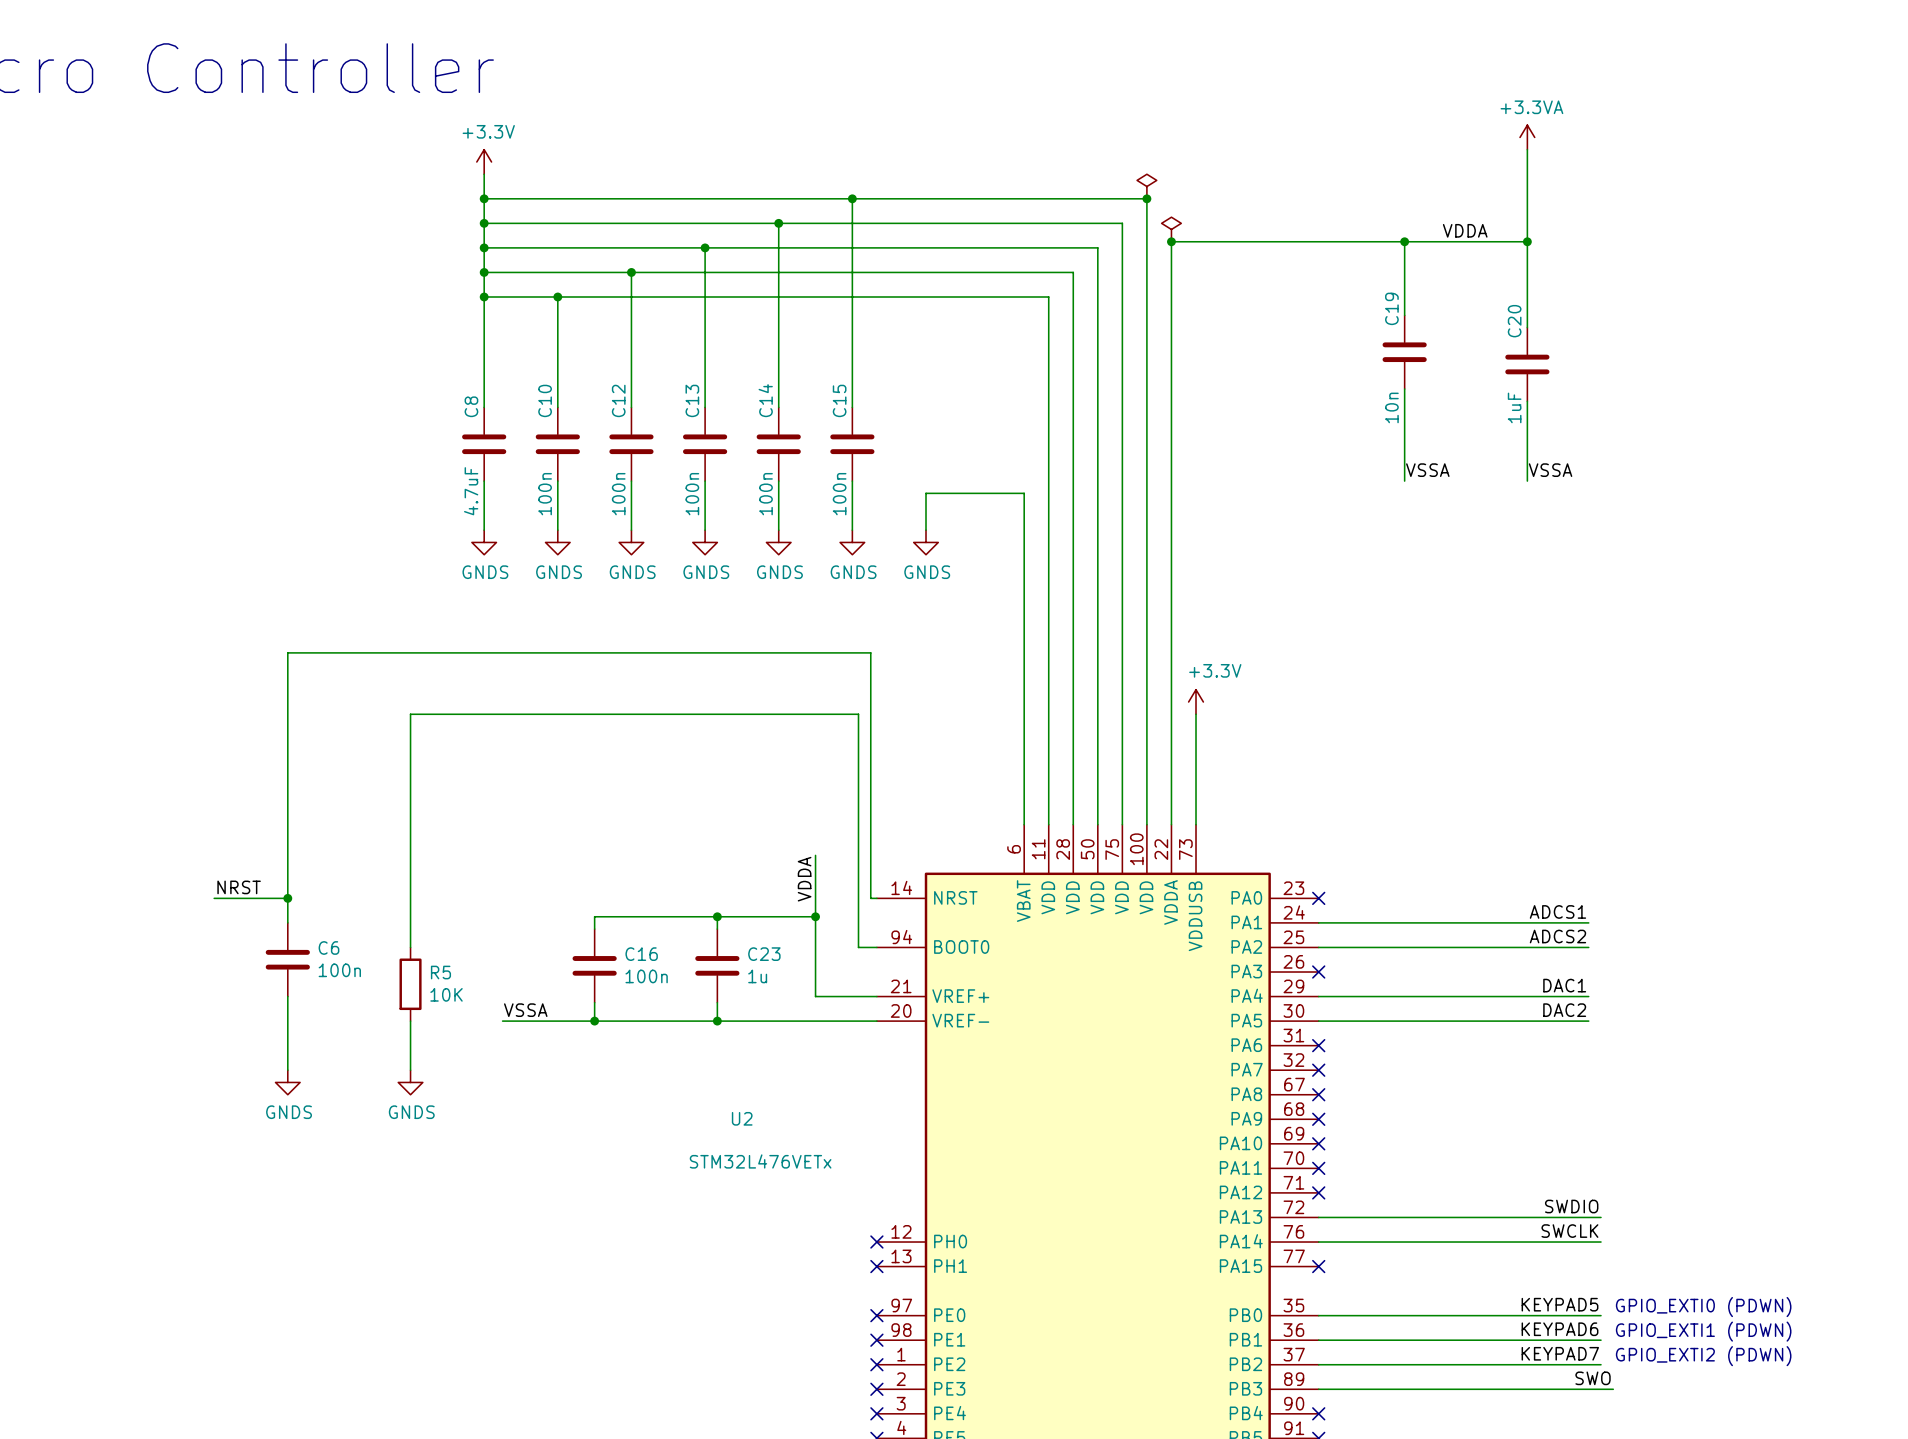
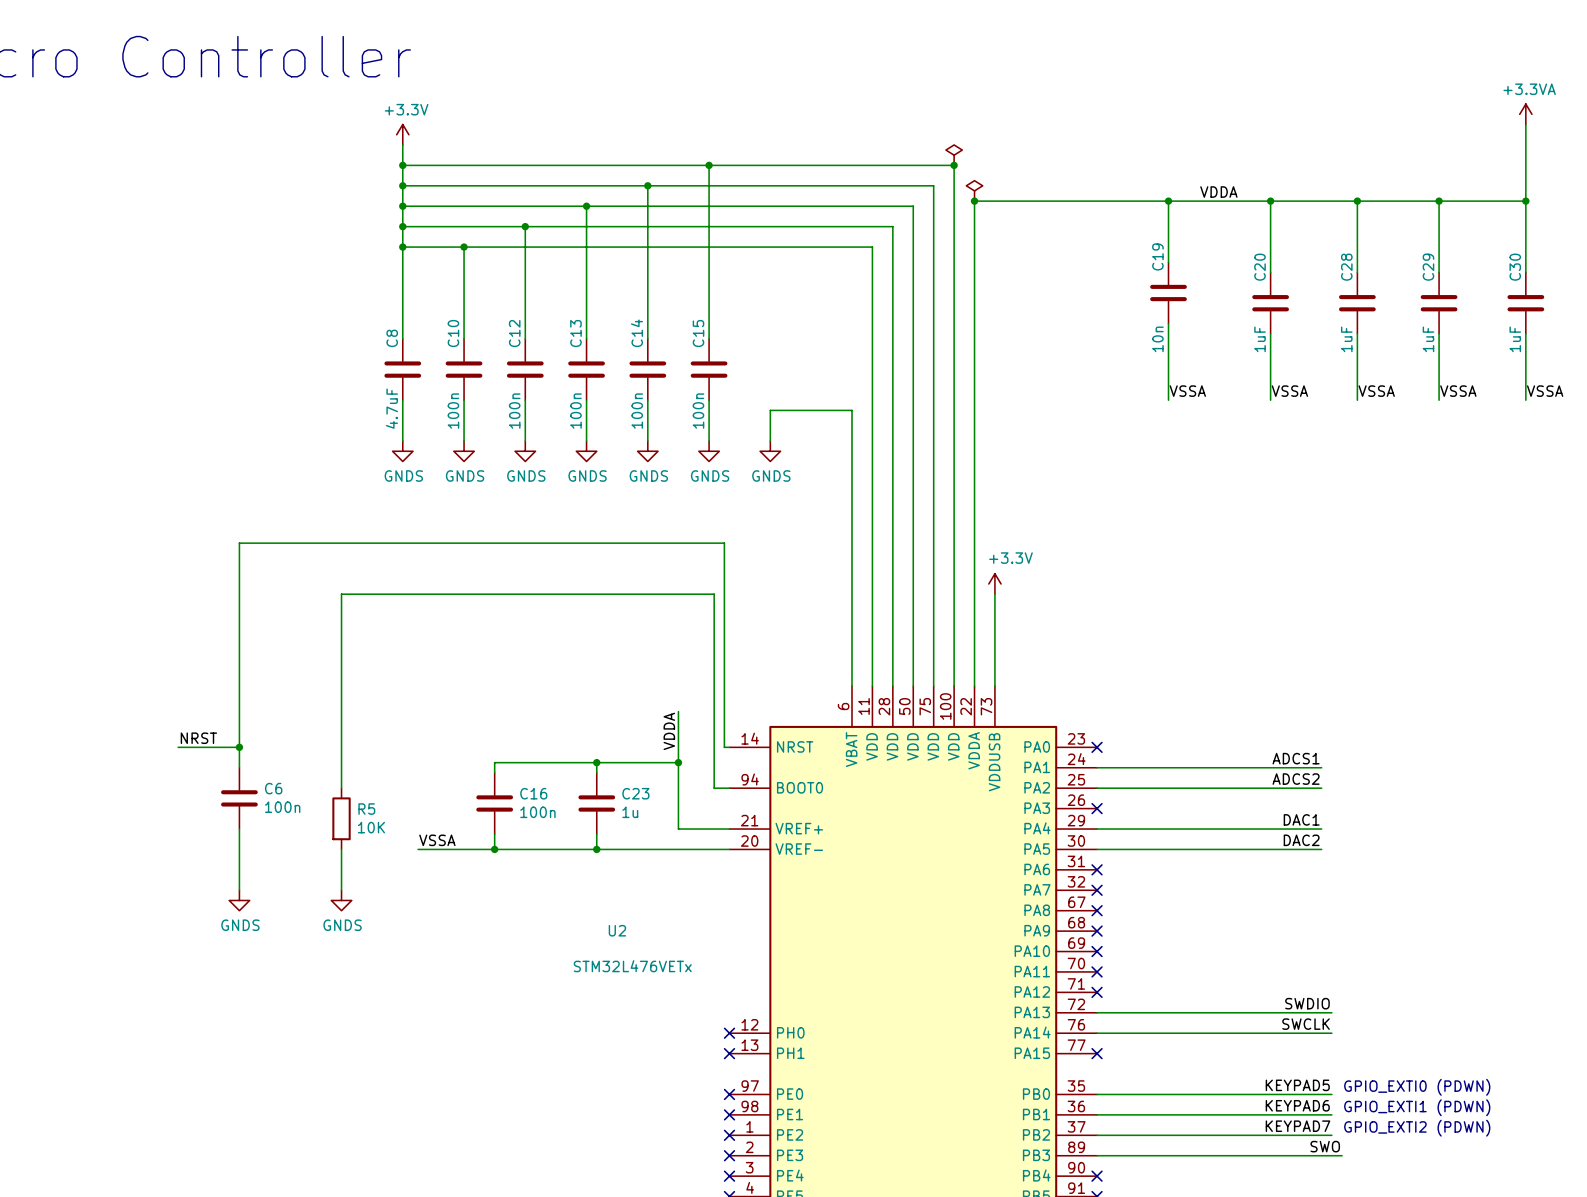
power symbol: +3.3VA (1527, 137) -> none
power symbol: none -> +3.3VA (1525, 114)
wire: (1527, 149) (1527, 241) -> (1525, 201) (1270, 201)
wire: none -> (1525, 124) (1525, 272)
wire: none -> (1357, 201) (1357, 272)
junction: none -> (1357, 201)
wire: none -> (1439, 201) (1439, 272)
junction: none -> (1439, 201)
junction: none -> (1525, 201)
C28: none -> 1uF (1357, 303)
C29: none -> 1uF (1439, 303)
C30: none -> 1uF (1525, 303)
wire: none -> (1357, 333) (1357, 400)
wire: none -> (1439, 333) (1439, 400)
wire: none -> (1525, 333) (1525, 400)
label: none -> VSSA (1376, 391)
label: none -> VSSA (1458, 391)
label: none -> VSSA (1545, 391)

